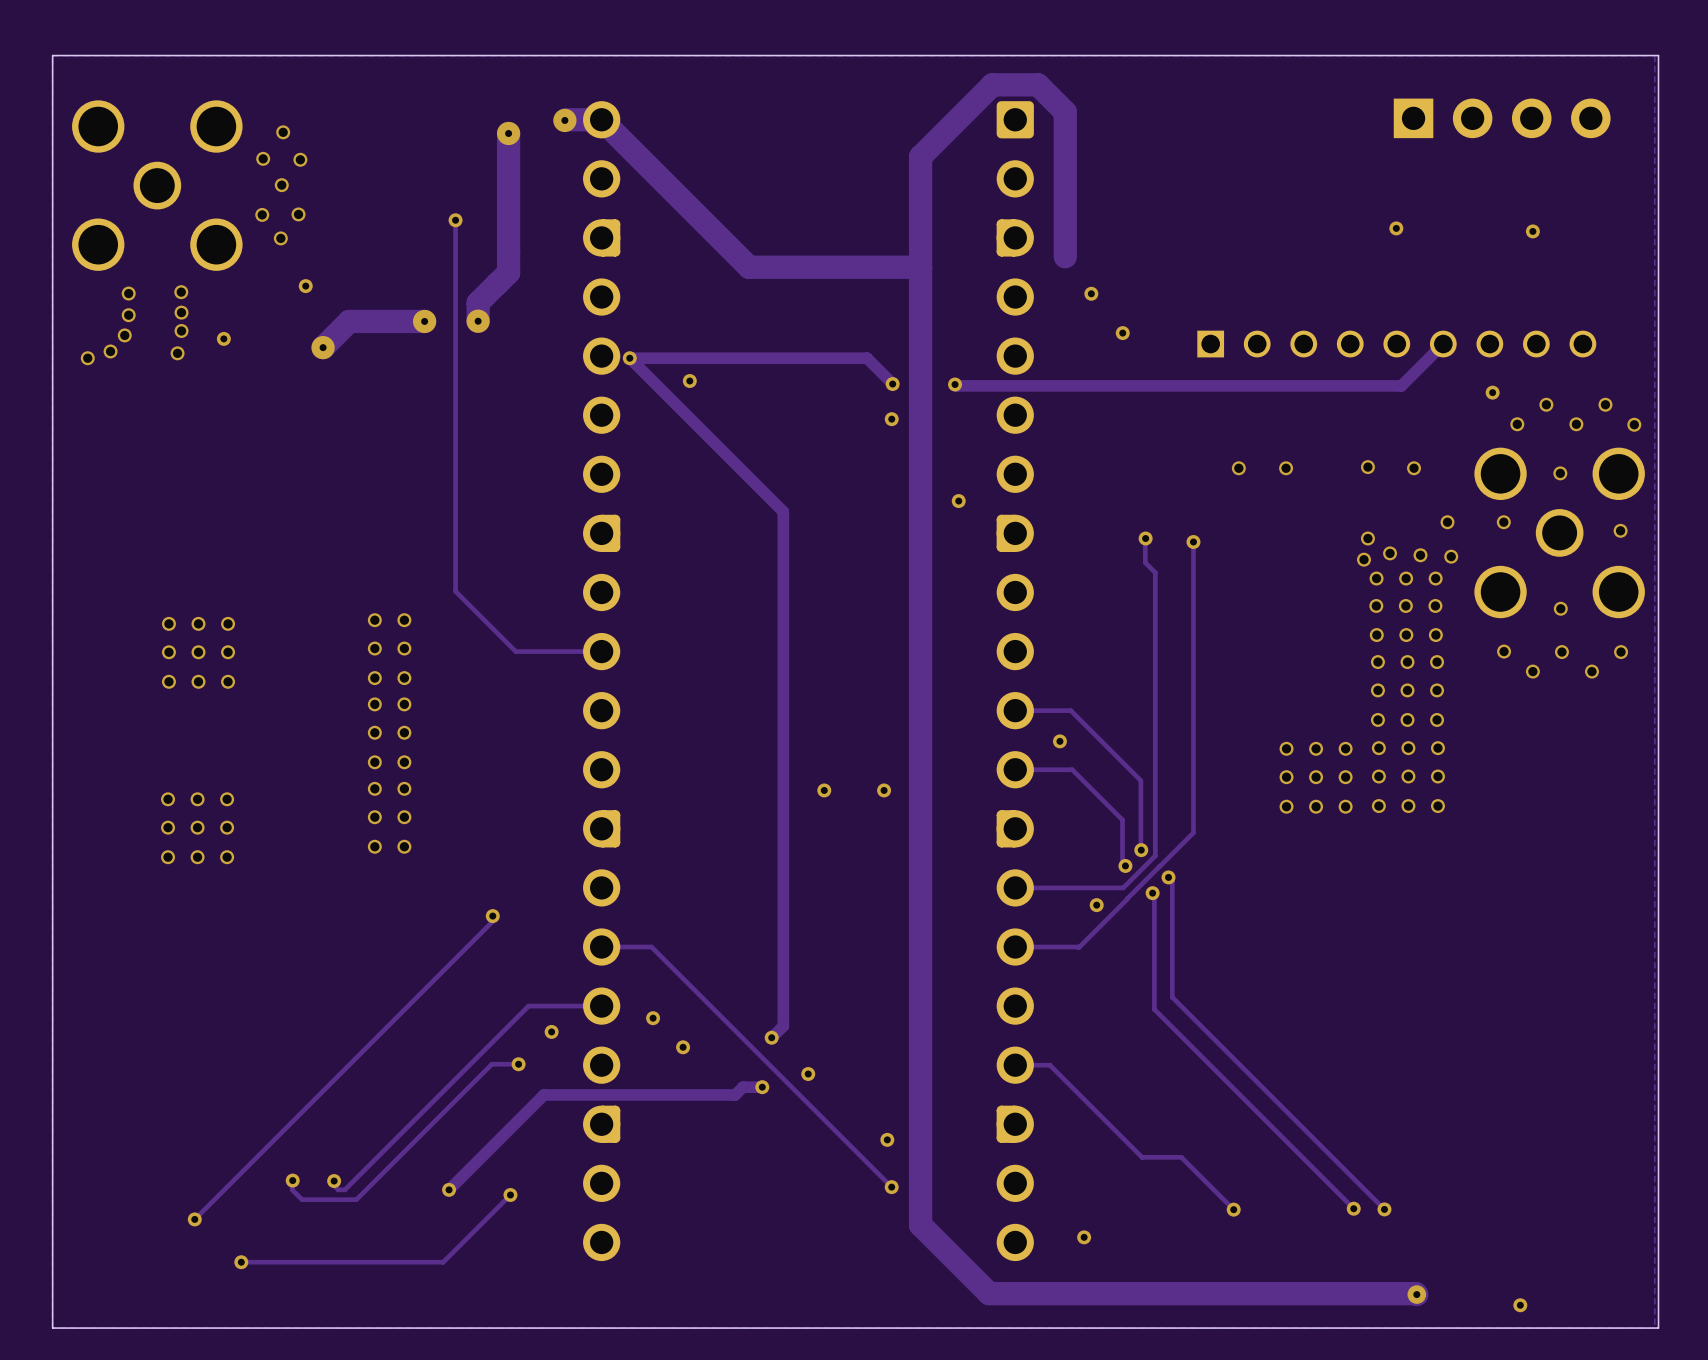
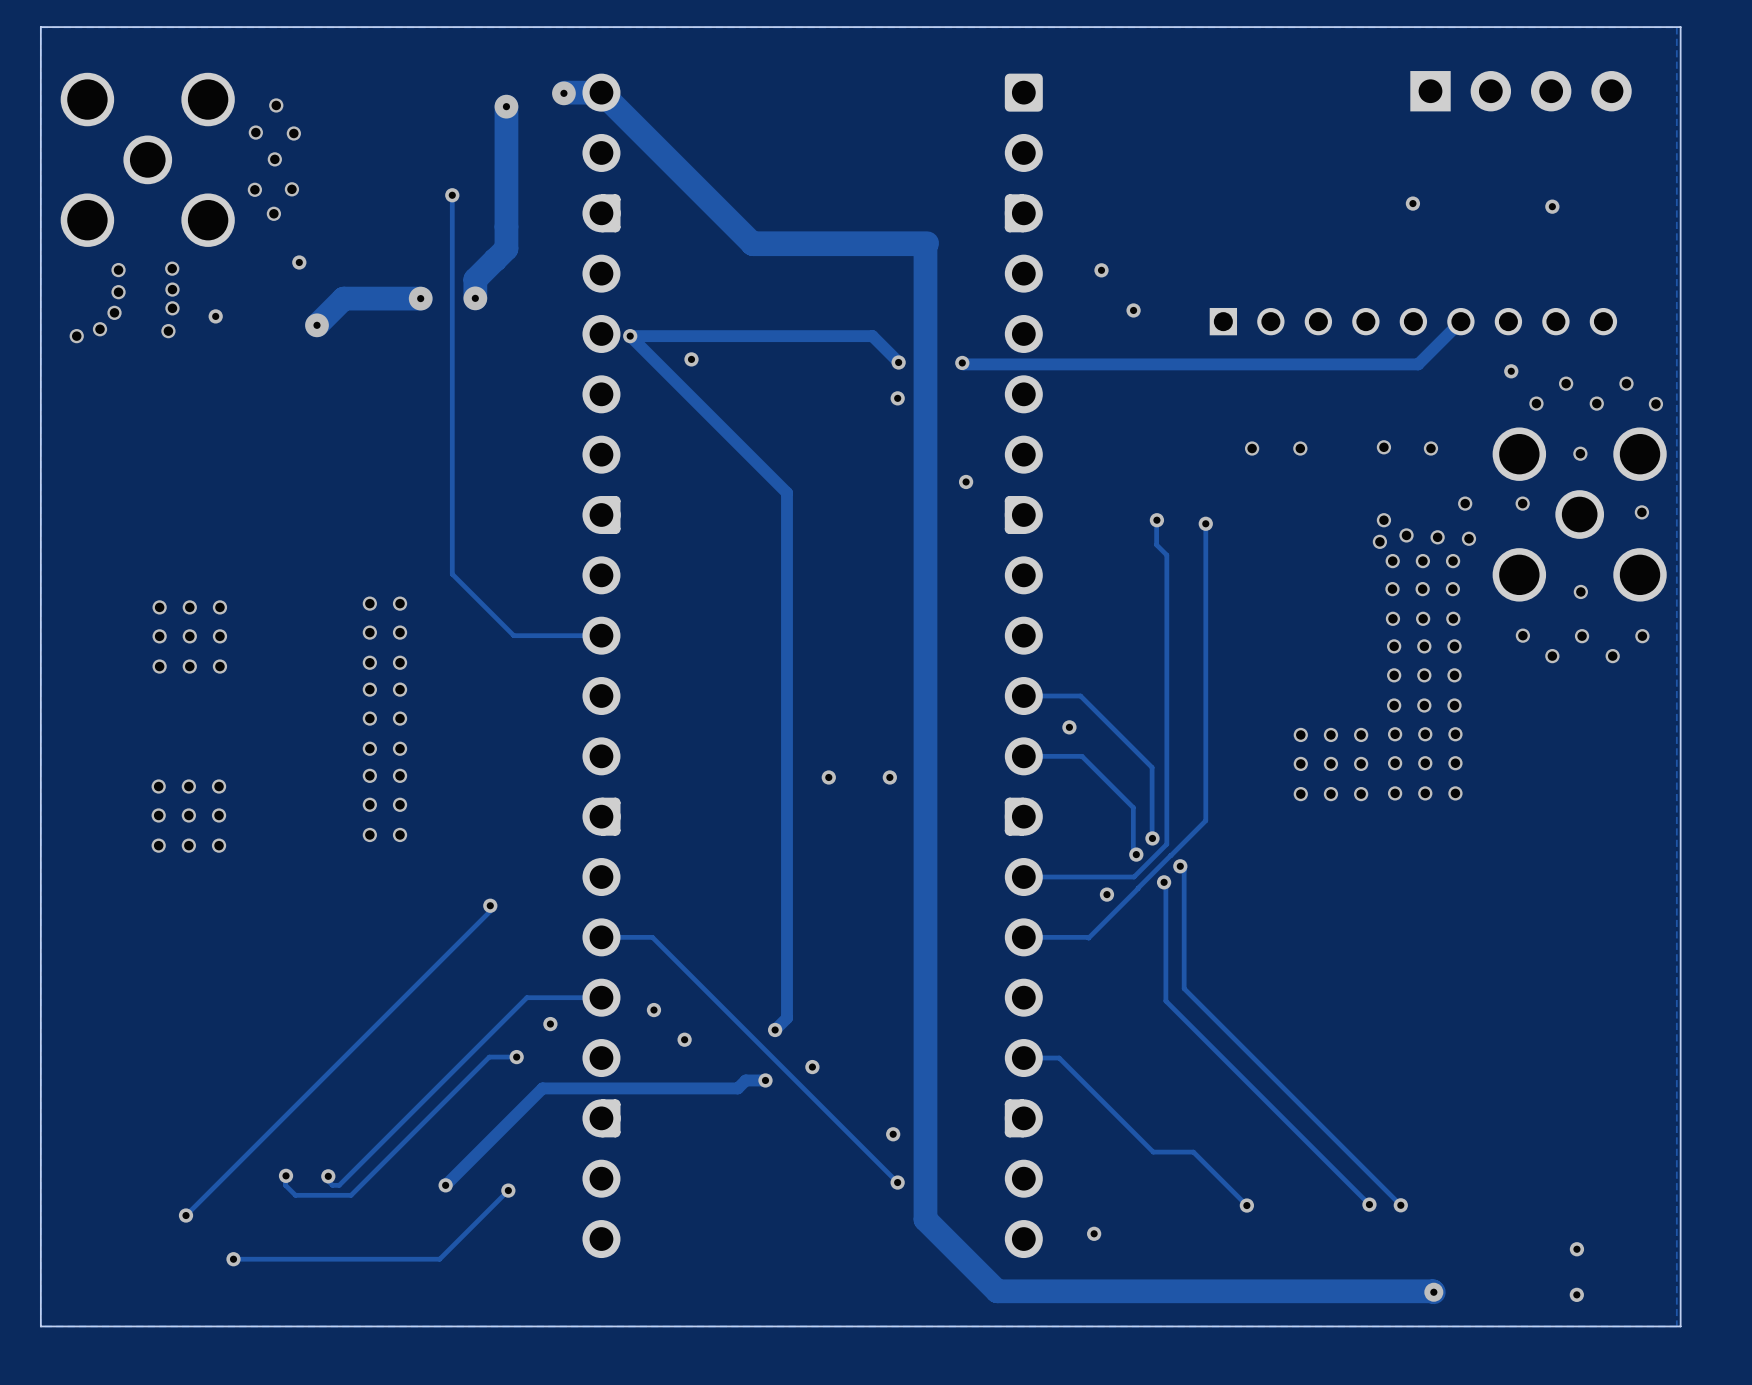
track: (1065, 256) (1065, 112) (1038, 84) (992, 84) (920, 156) (920, 1225) -> (752, 243) (925, 244) (925, 1219) (927, 1221)
via: none -> (1576, 1249)
via: none -> (1576, 1294)
via: (1520, 1305) -> none

